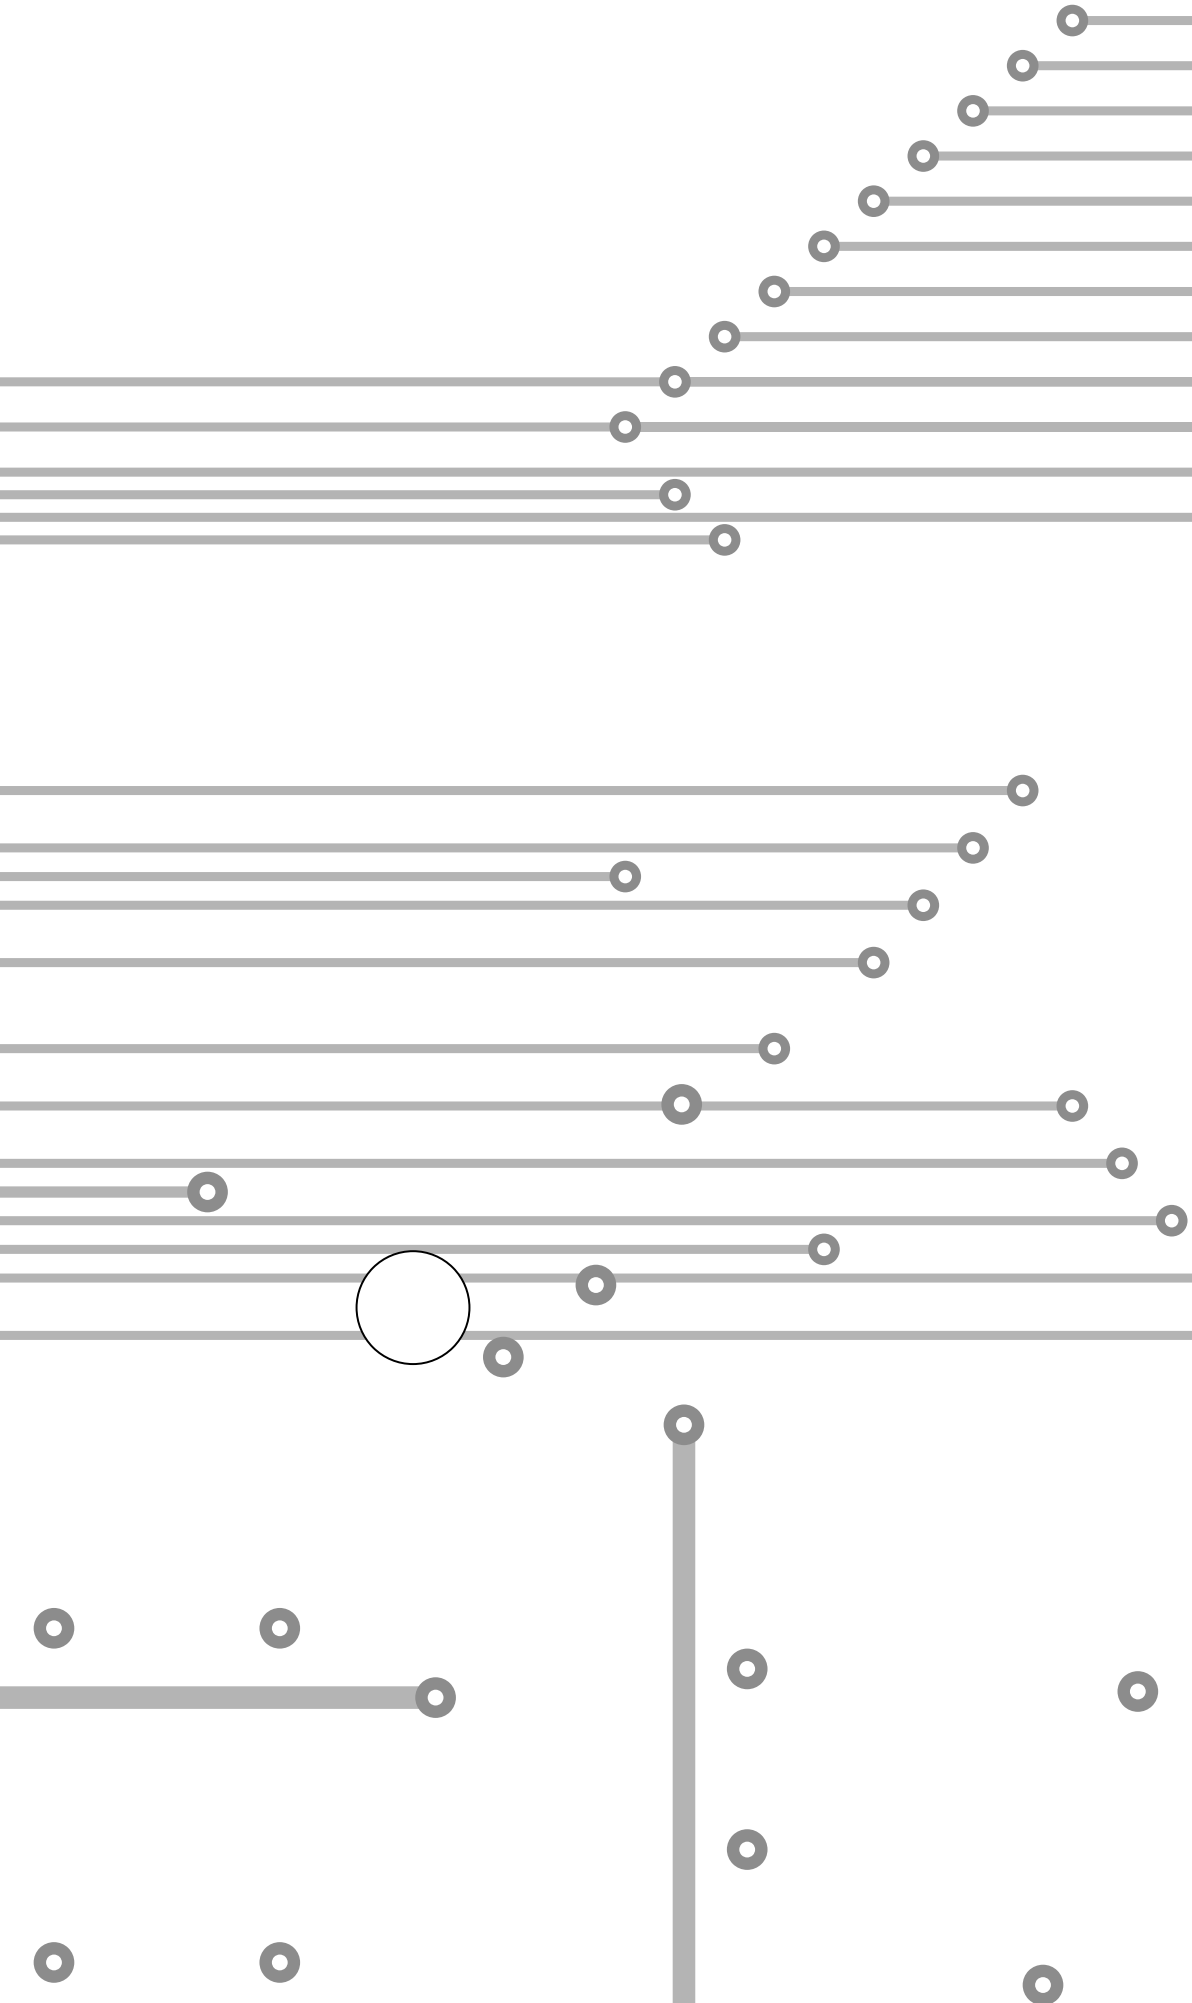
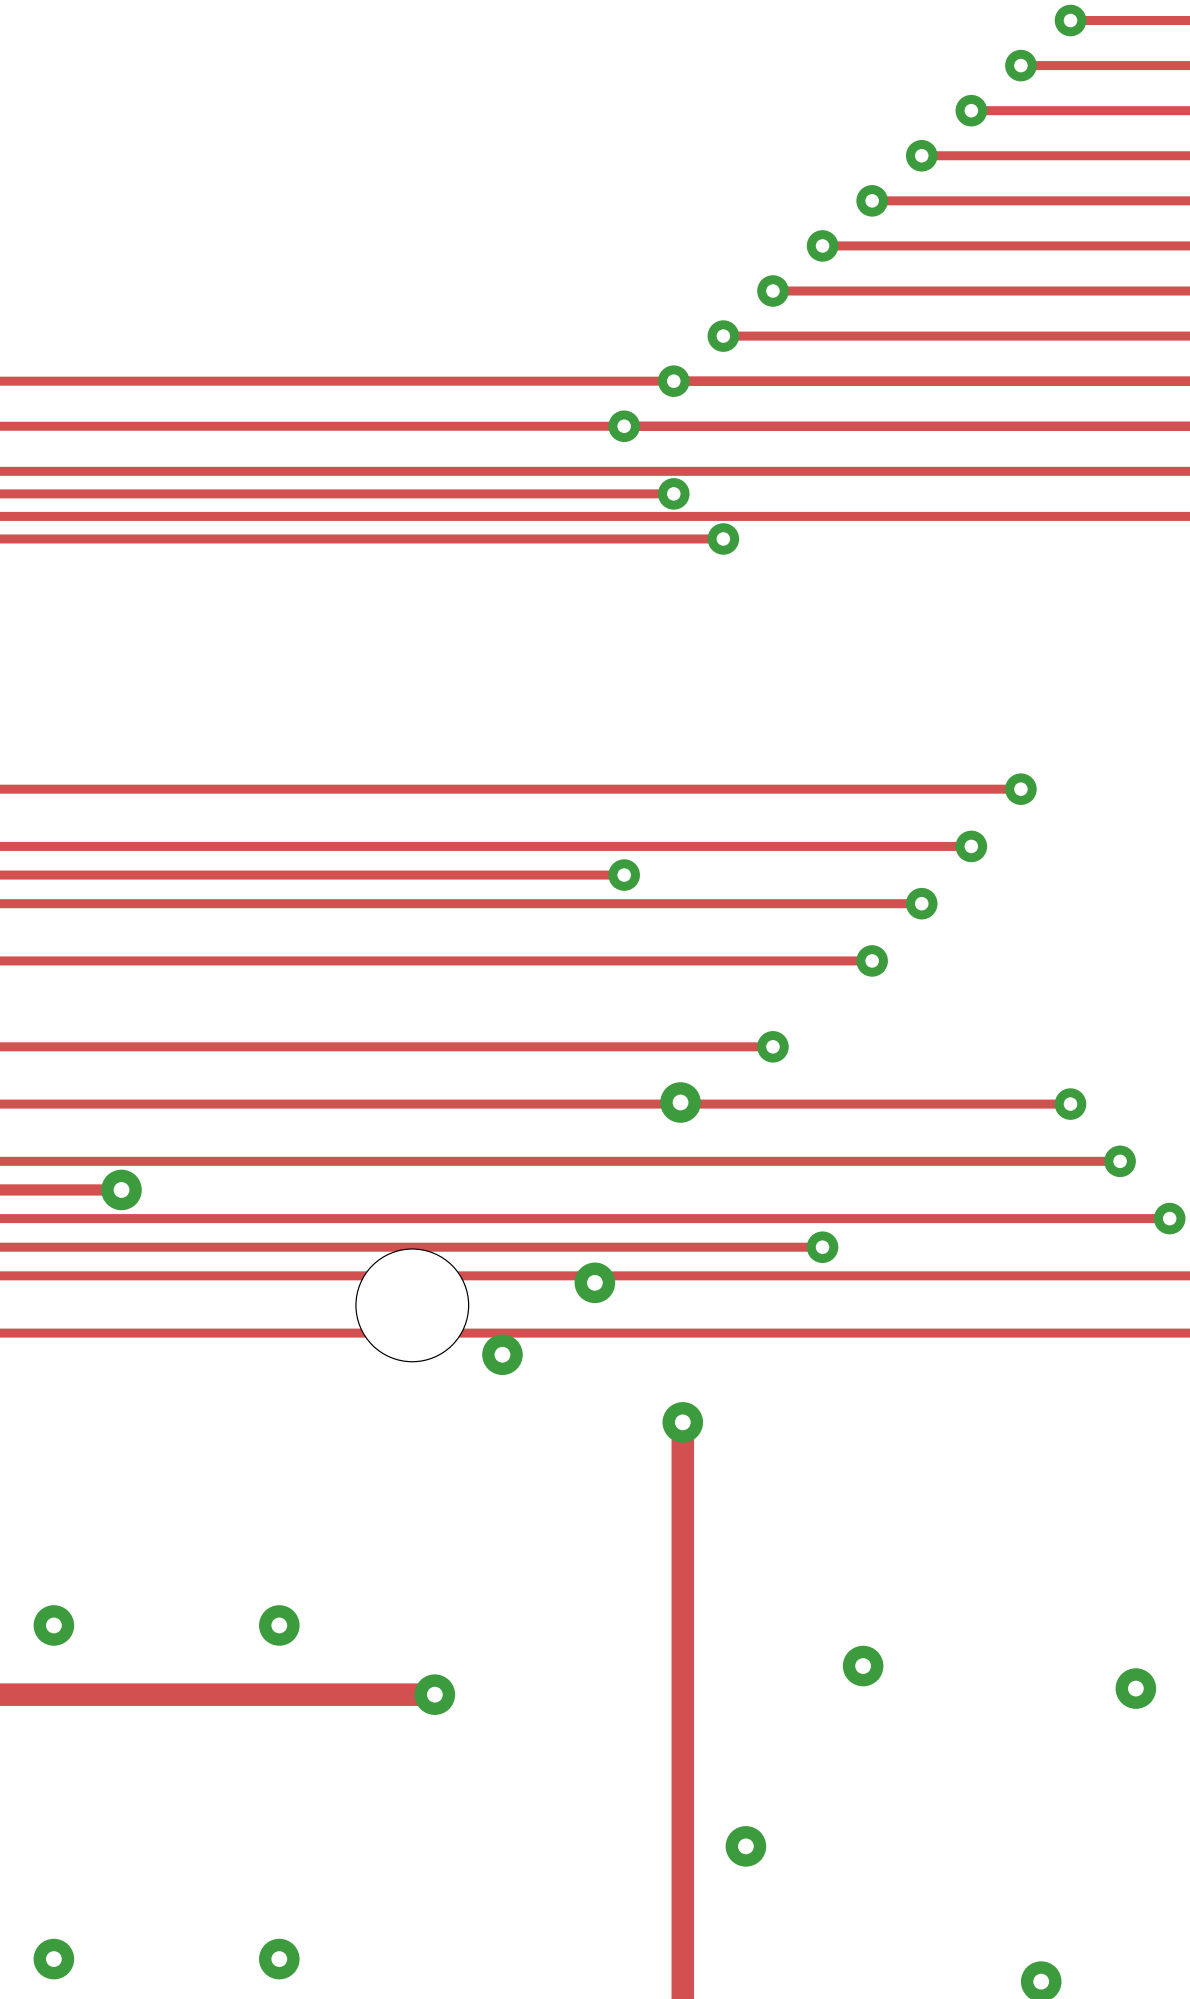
track: (121, 1192) (207, 1192) -> none
via position: (207, 1192) -> (121, 1189)
via position: (747, 1668) -> (863, 1666)

